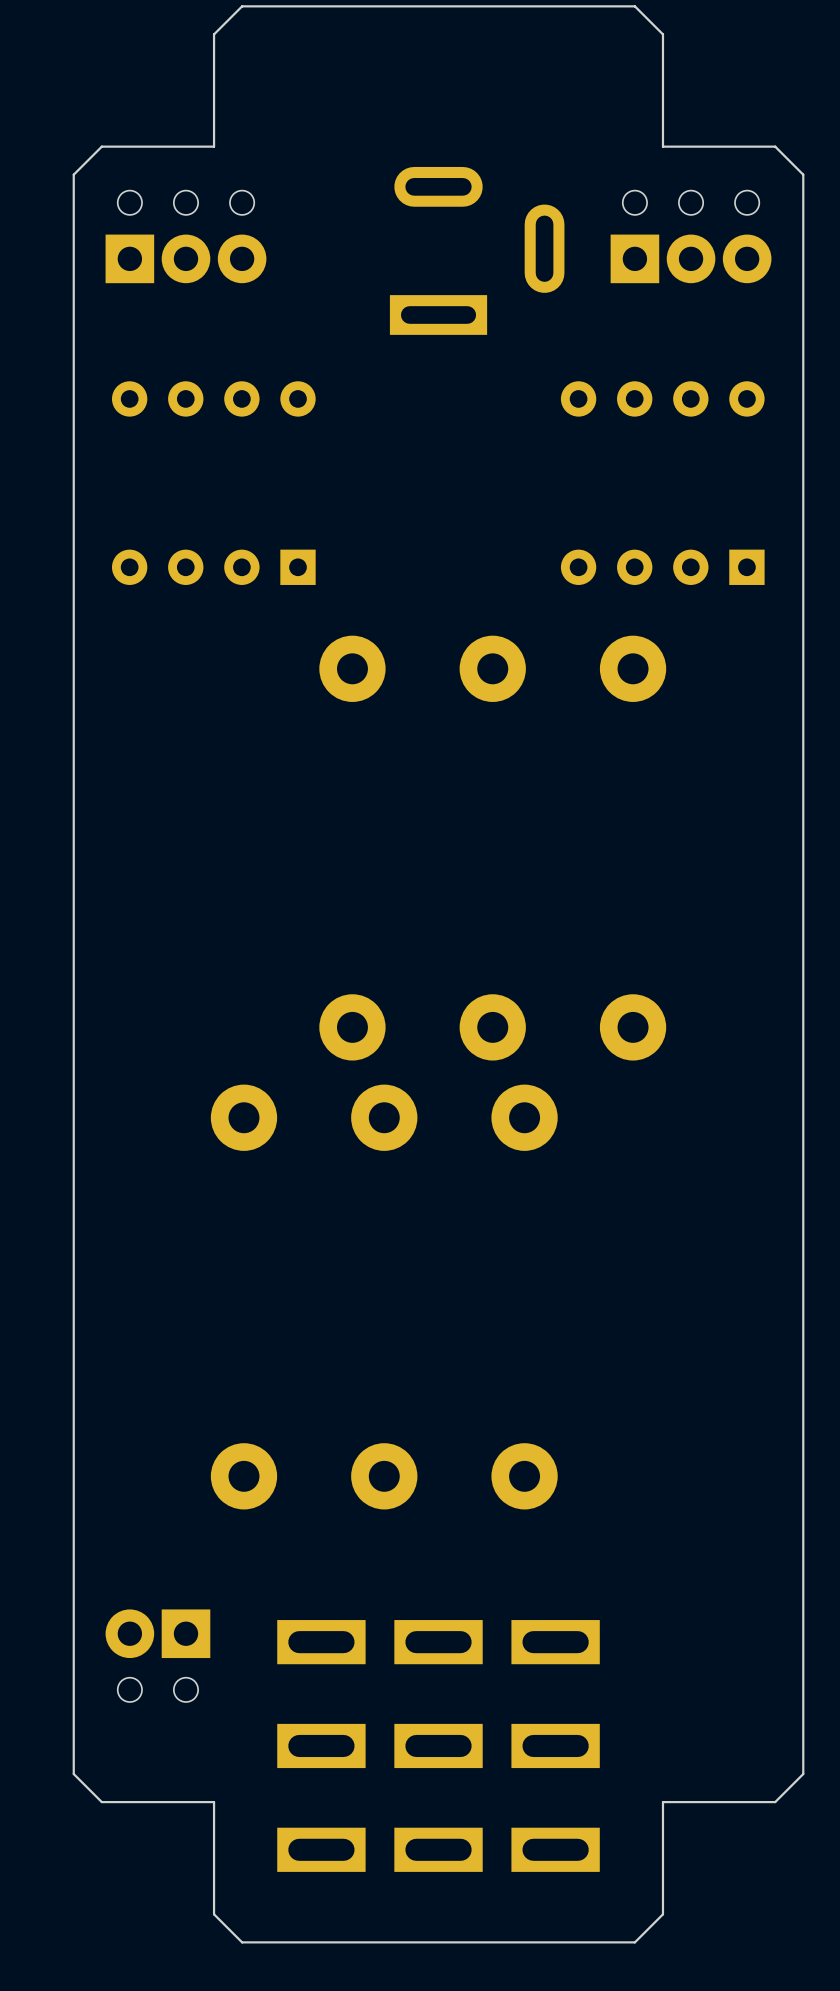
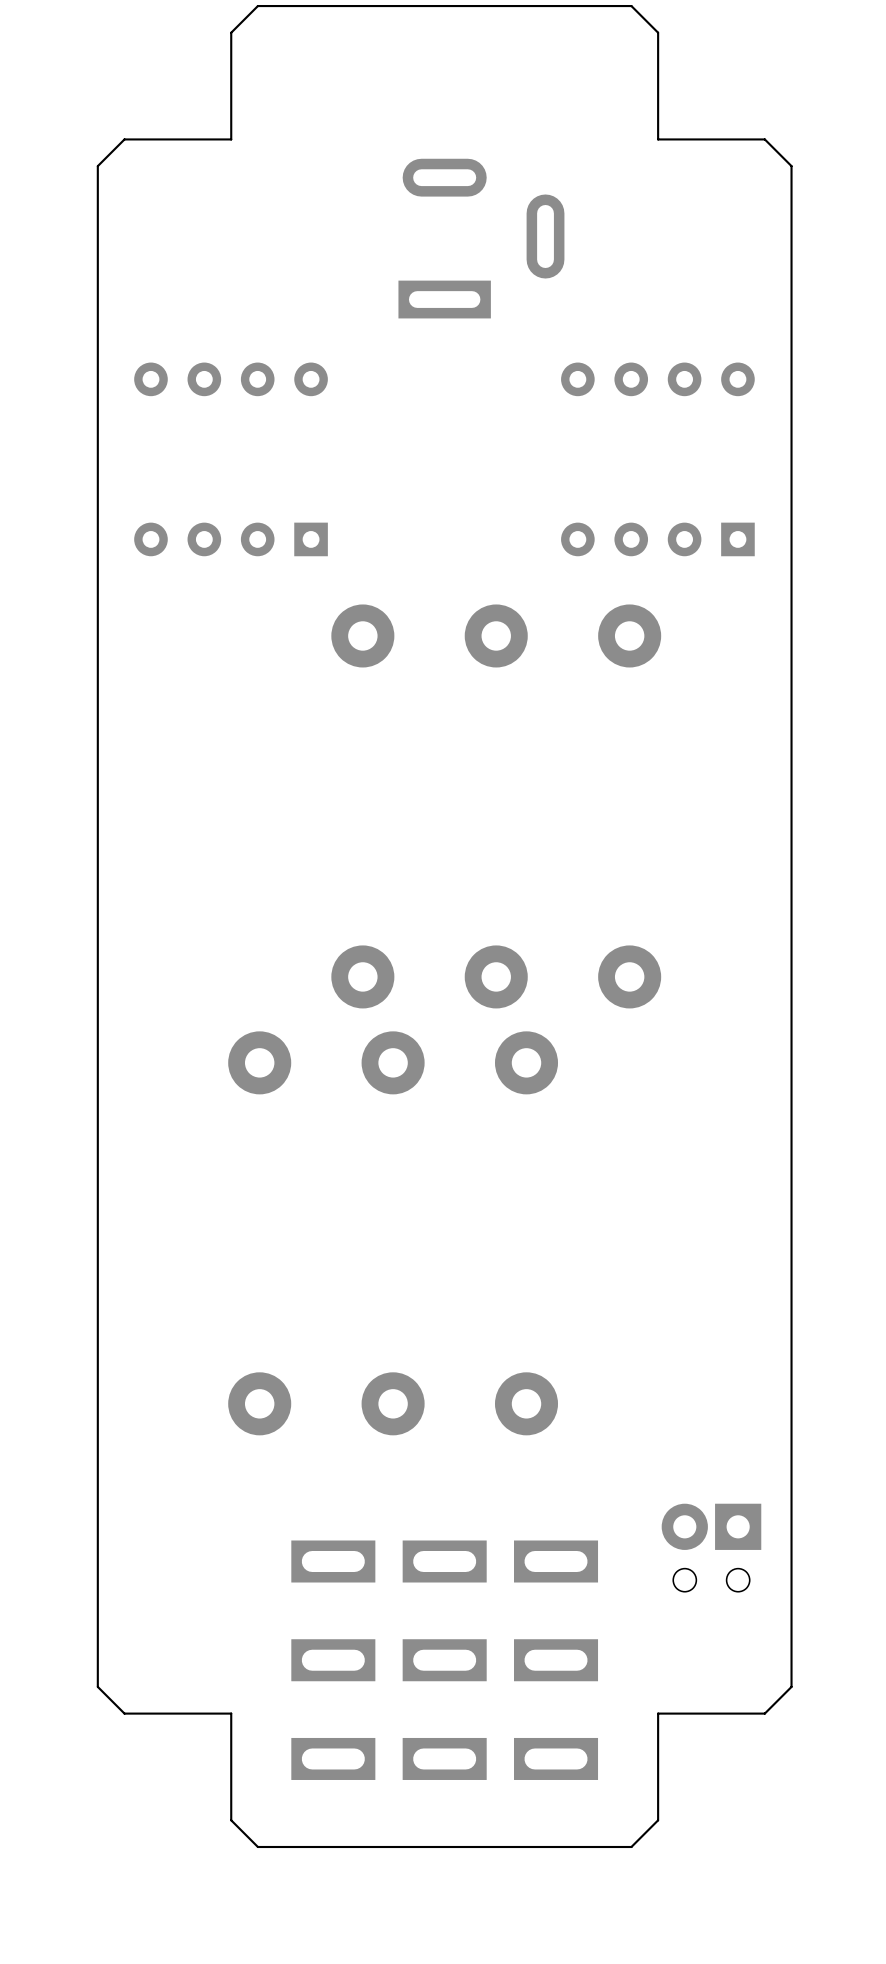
part: (185, 236) -> none
part: (691, 236) -> none
part: none -> (711, 1547)
part: (157, 1655) -> none

